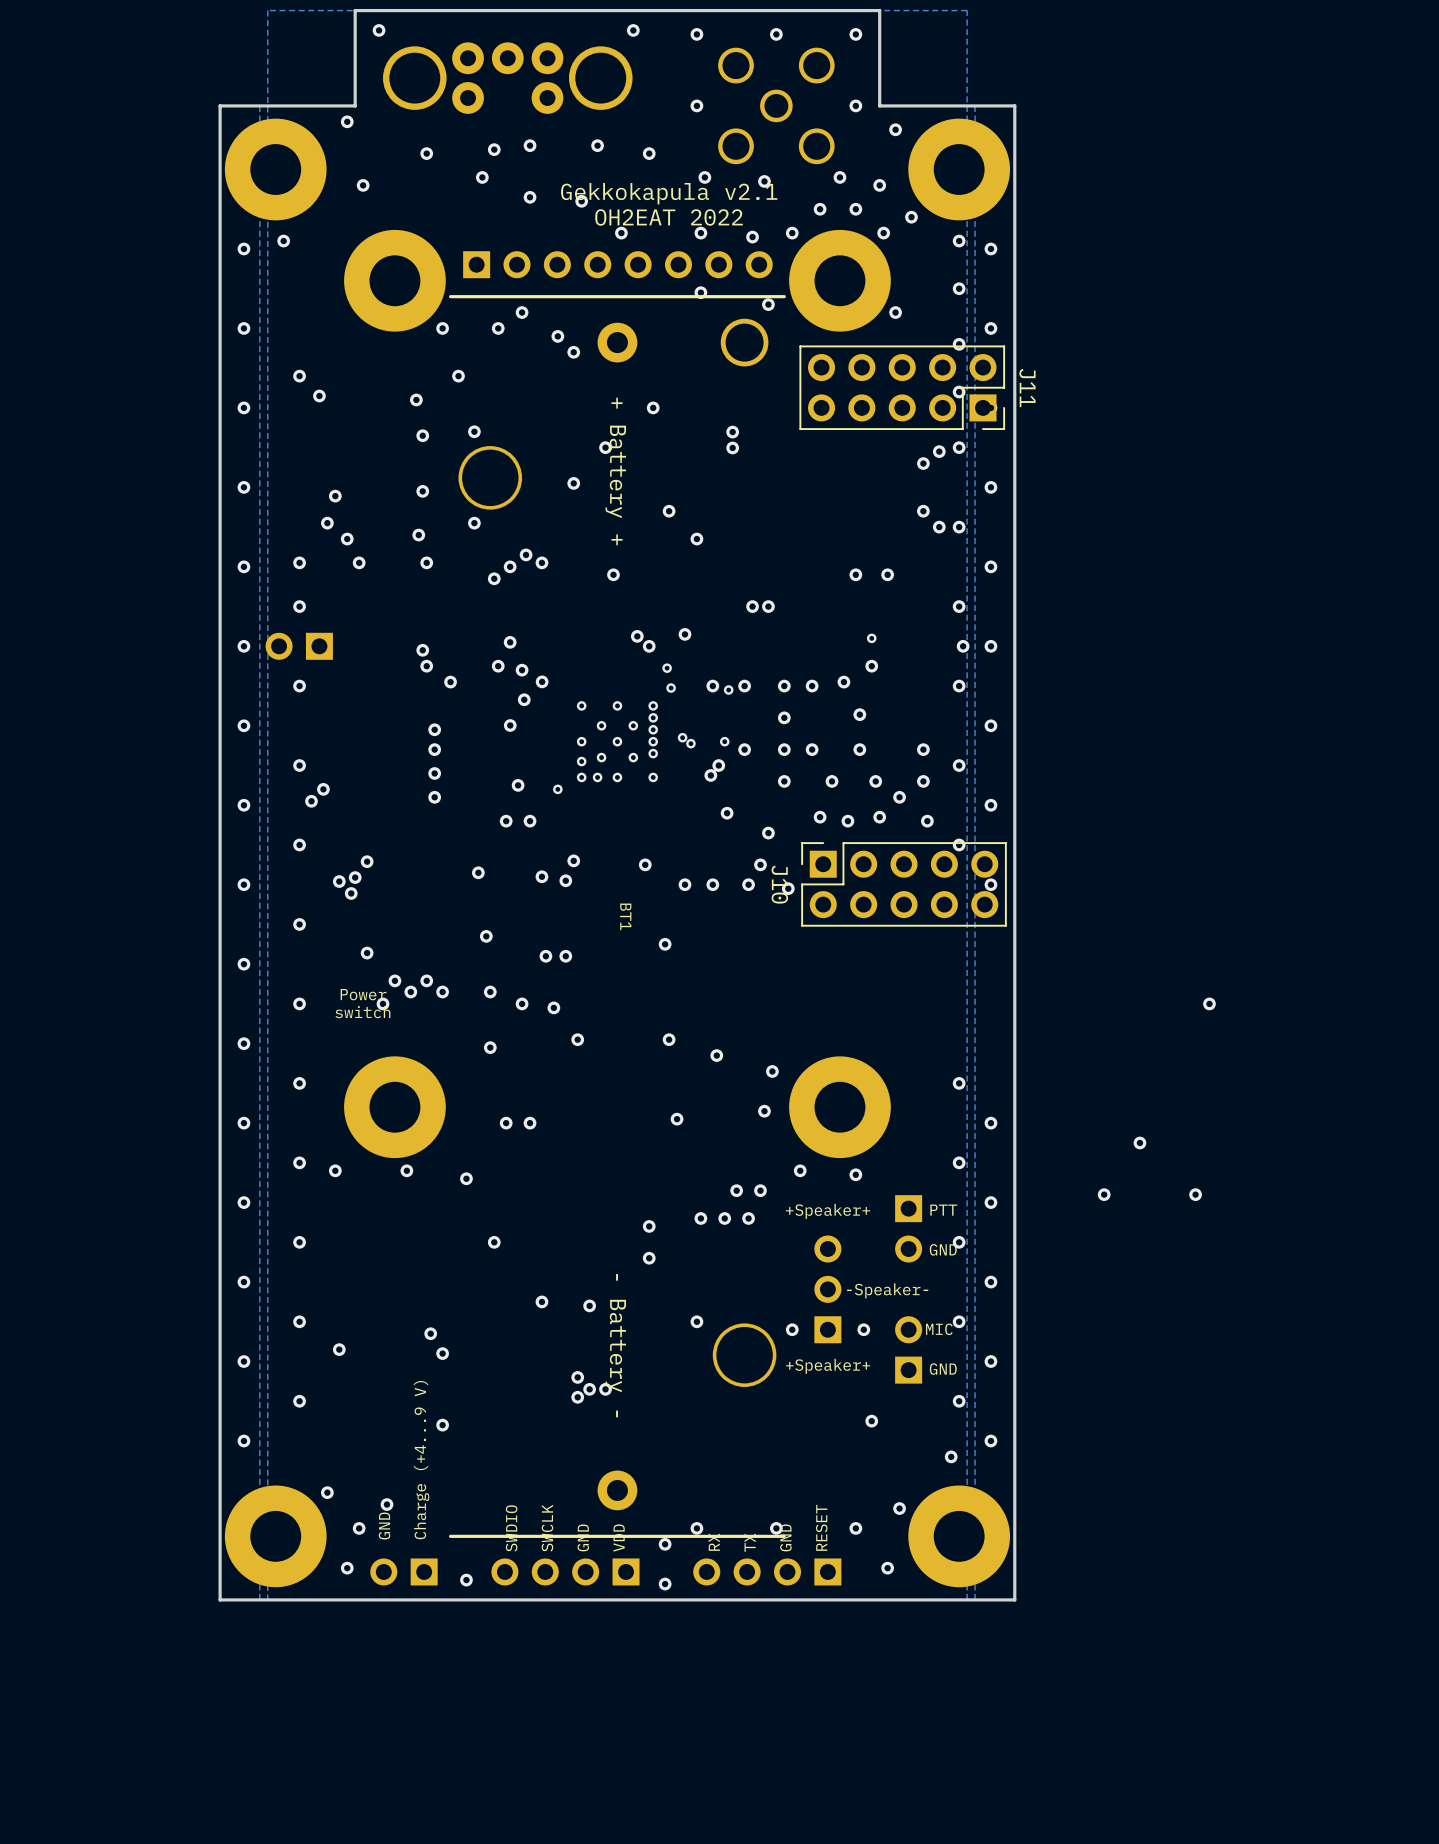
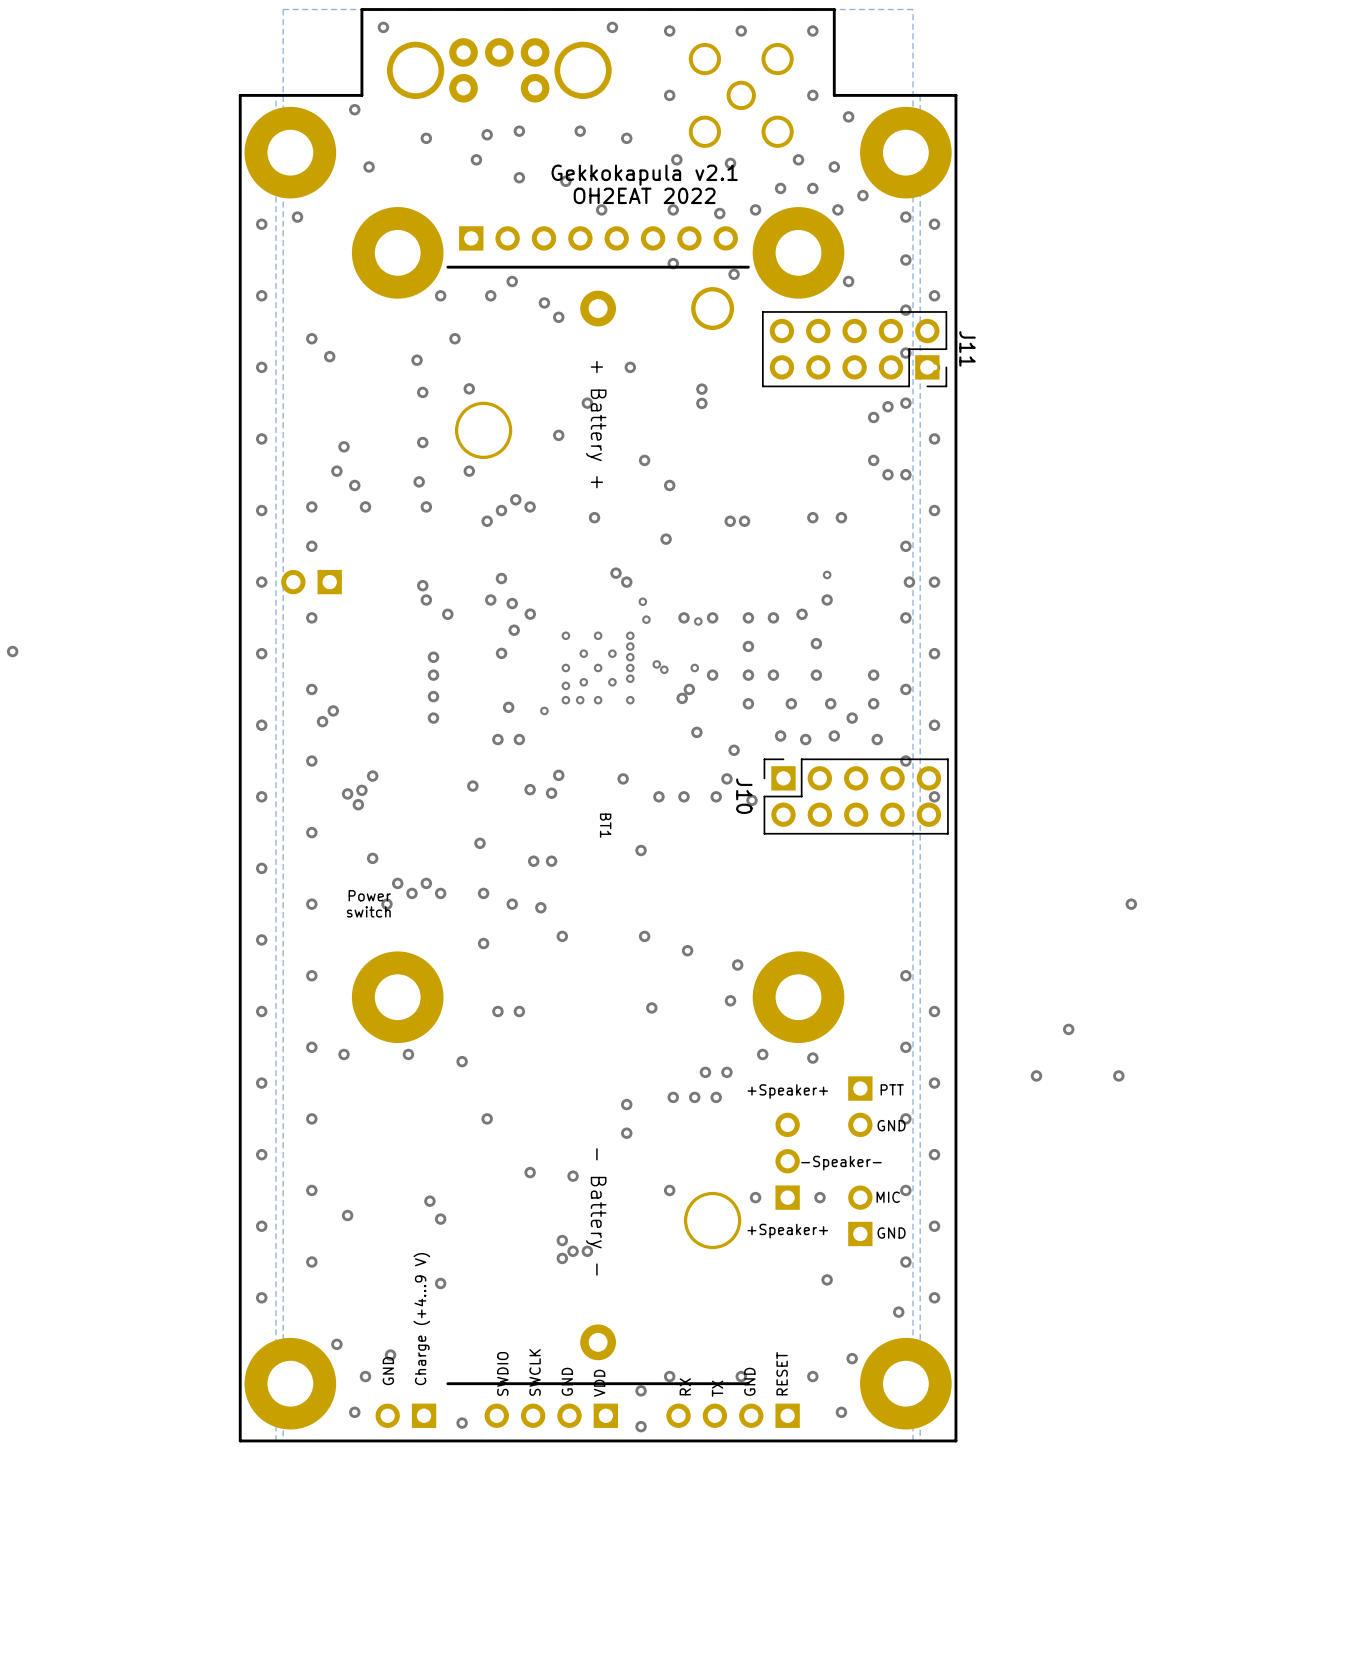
via: none -> (730, 521)
via: none -> (744, 521)
via: none -> (666, 539)
via: (752, 606) -> none
via: (768, 606) -> none
via: (684, 634) -> none

